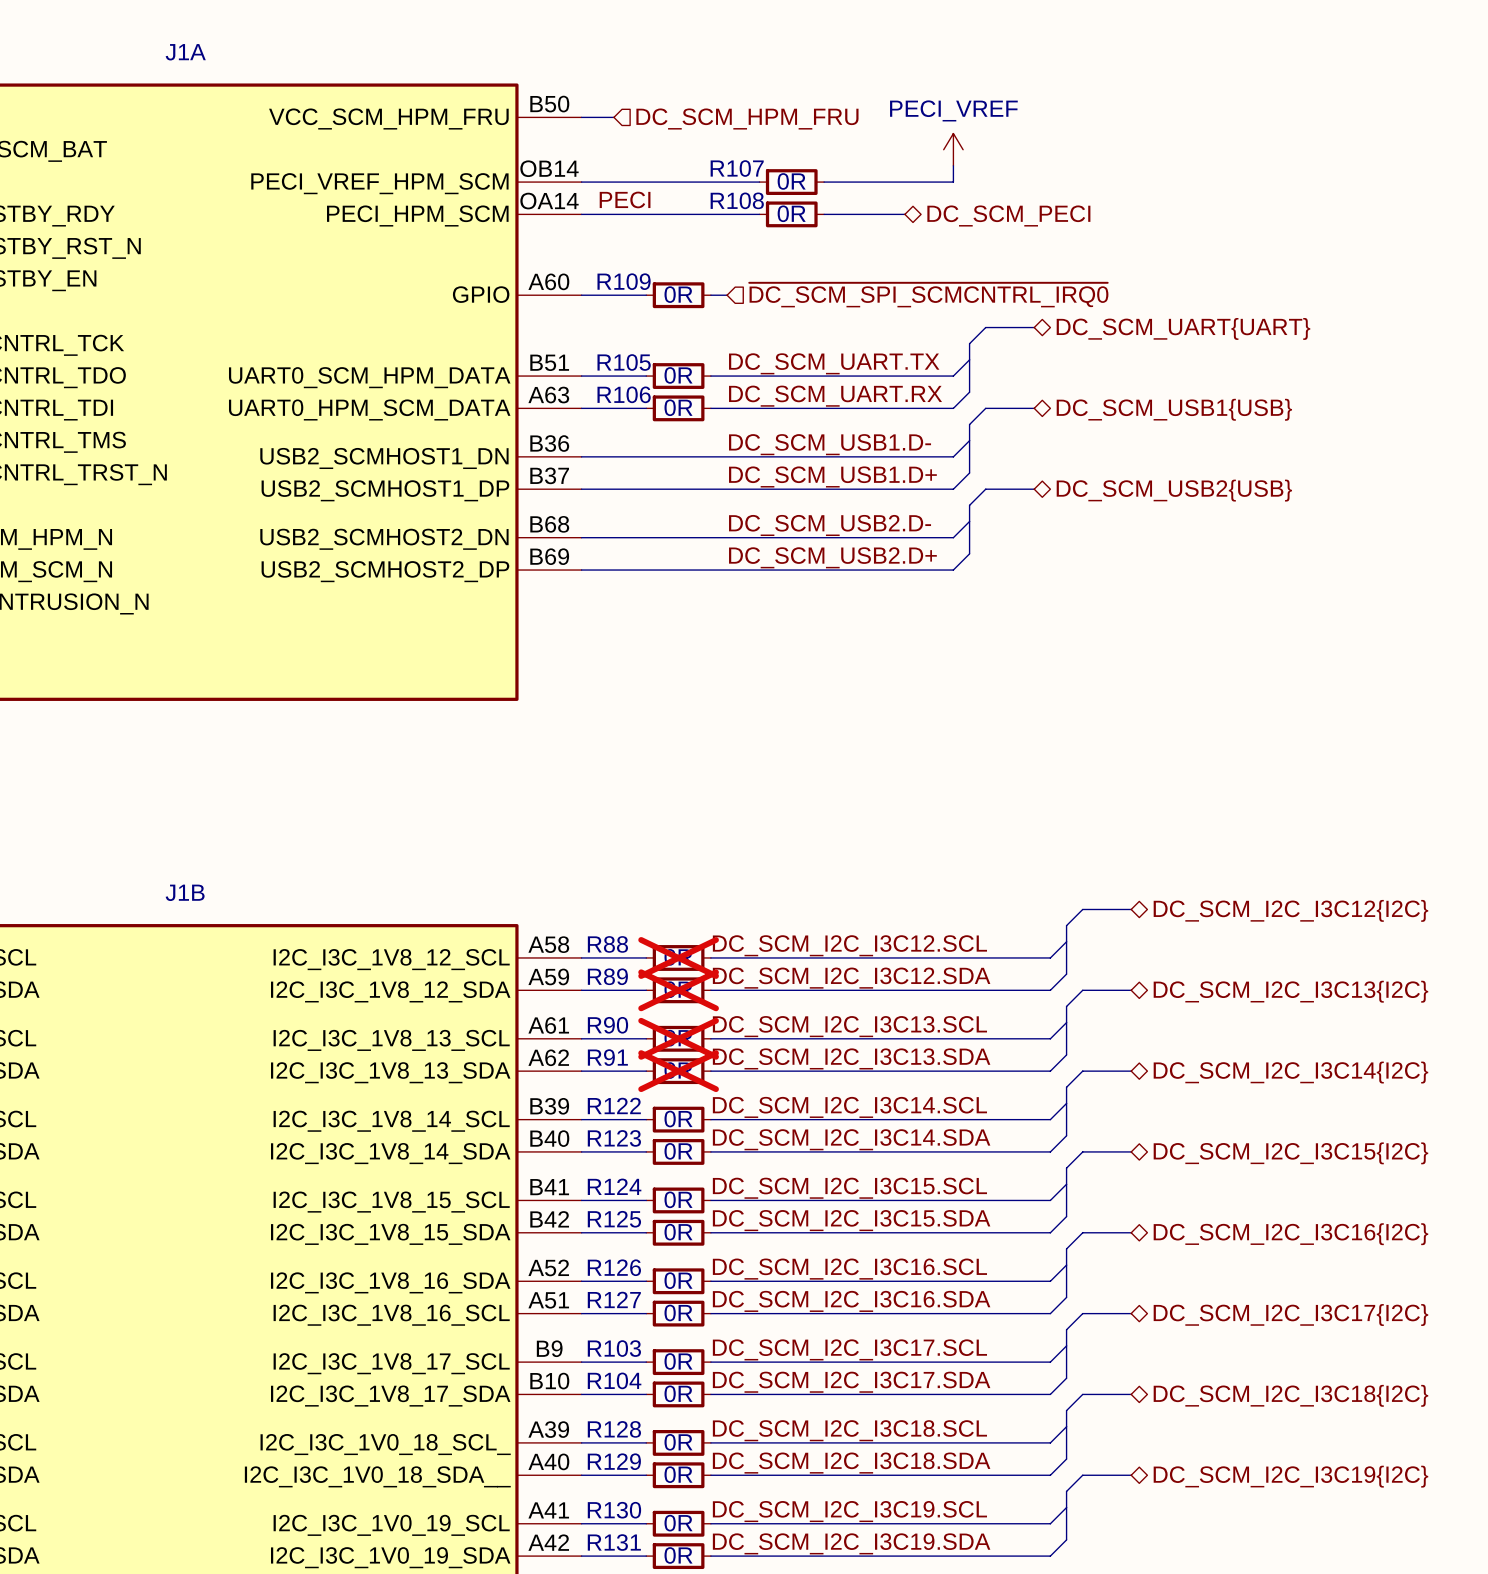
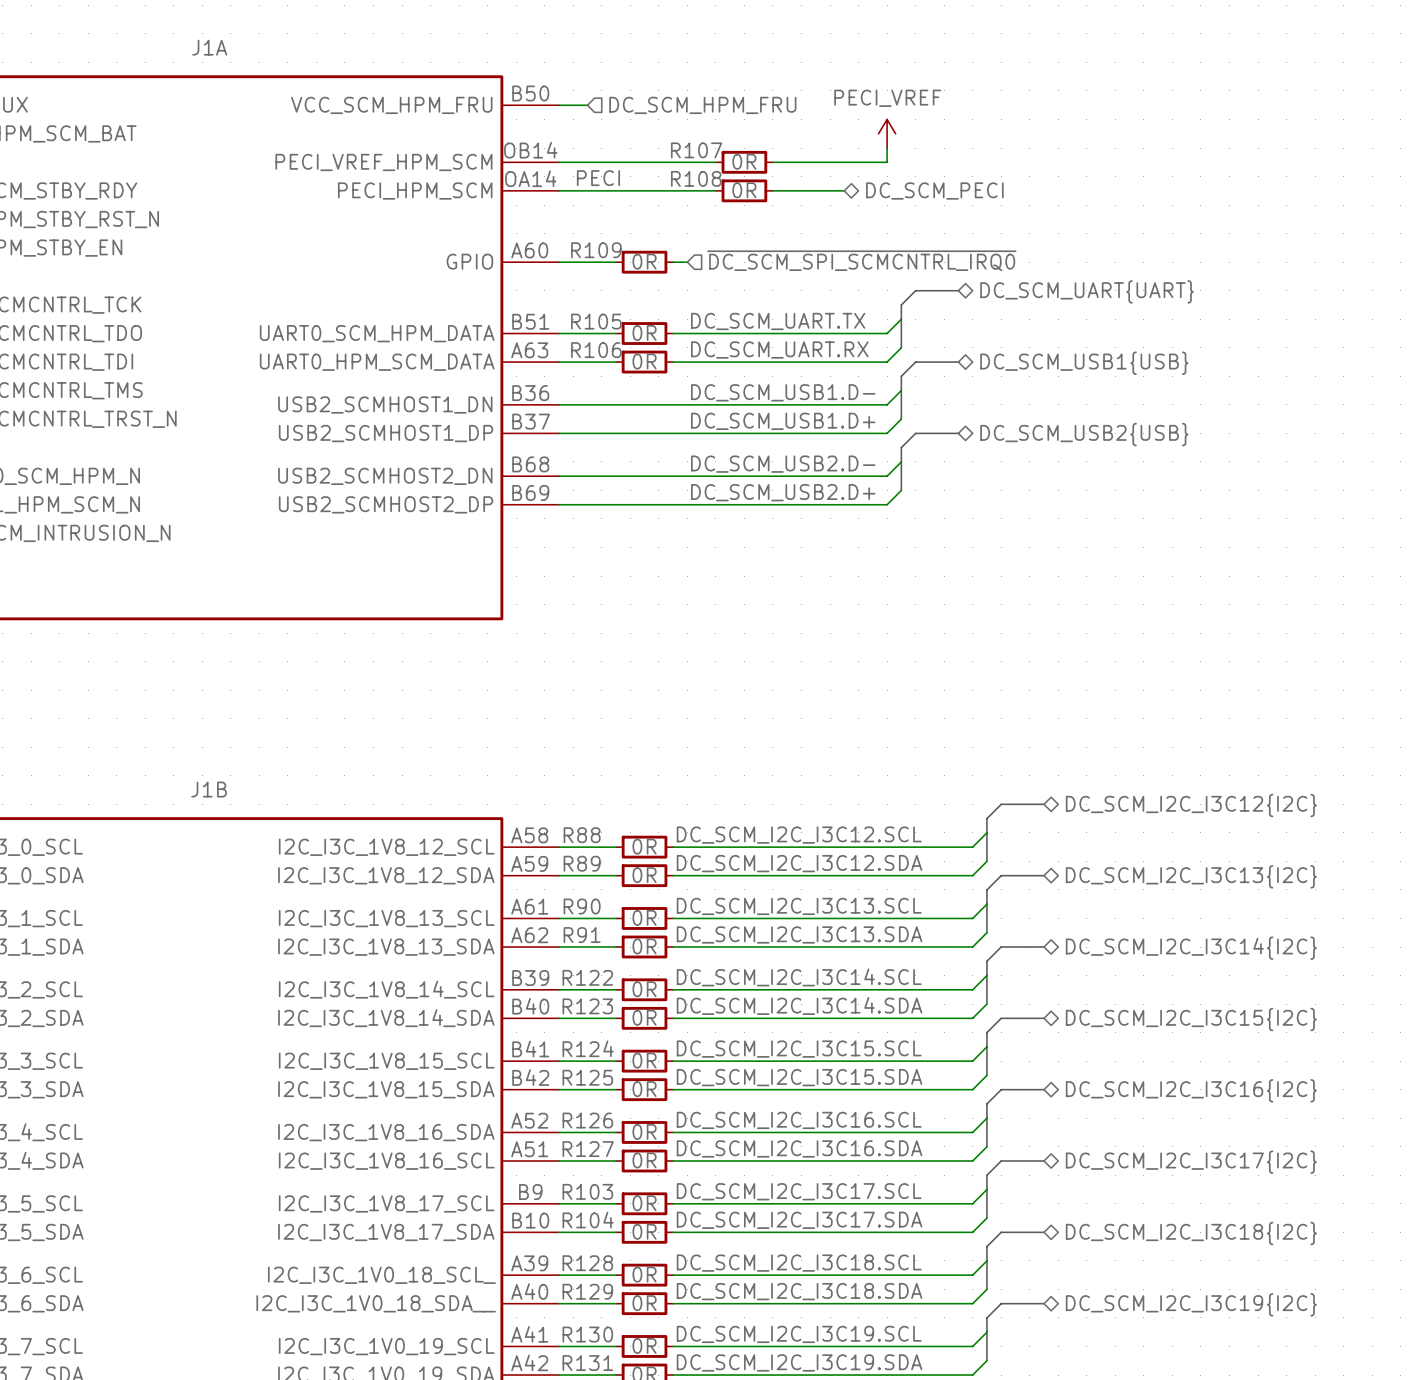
R88 do-not-place cross: (678, 957) -> none
R89 do-not-place cross: (678, 990) -> none
R90 do-not-place cross: (678, 1038) -> none
R91 do-not-place cross: (678, 1071) -> none

